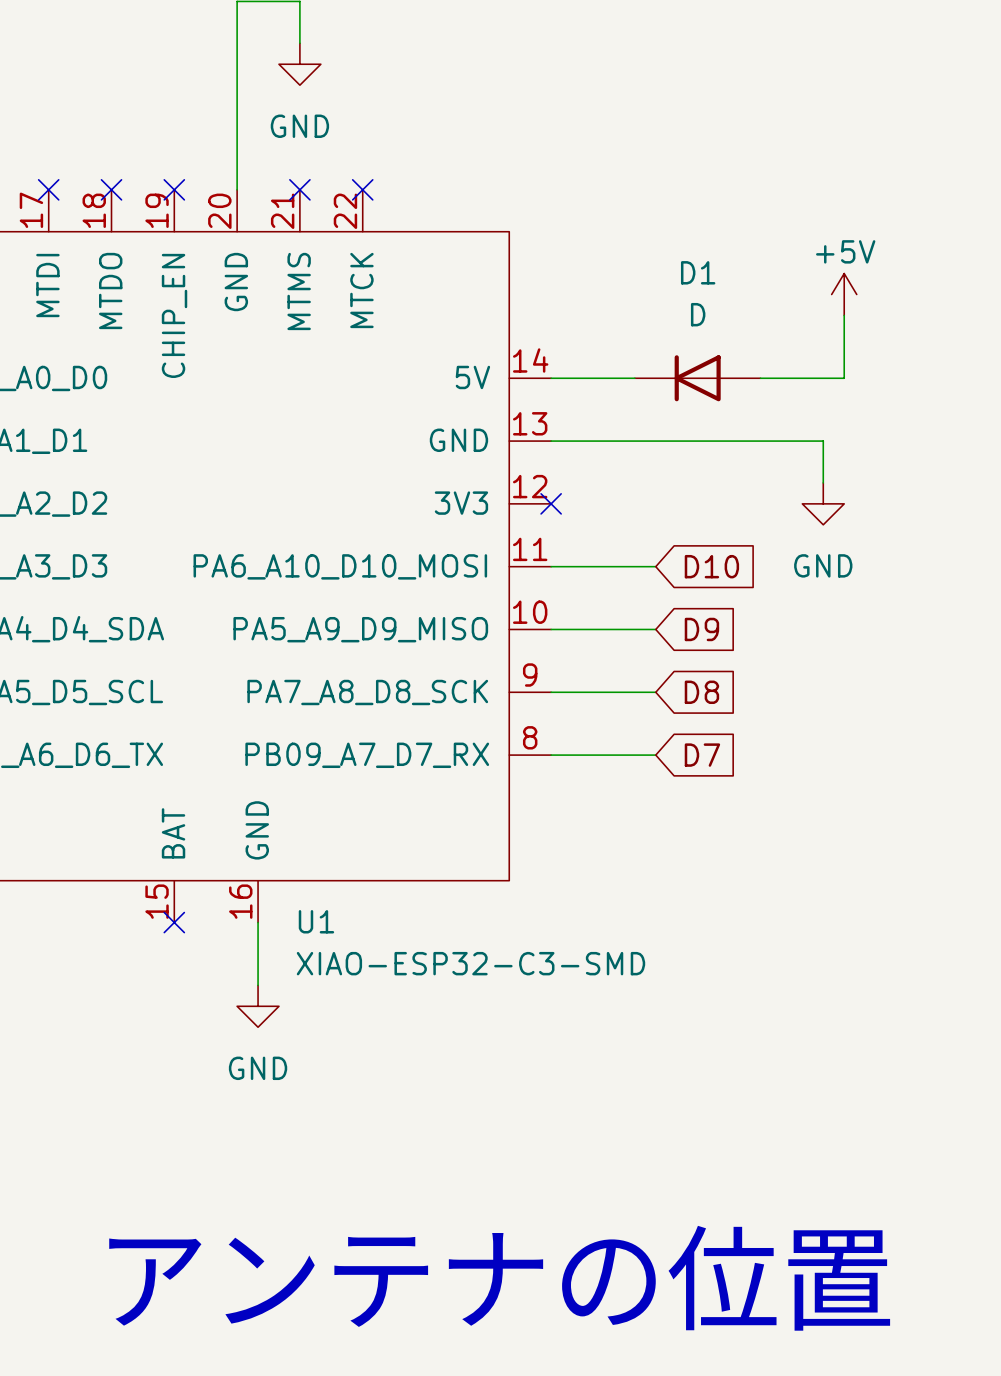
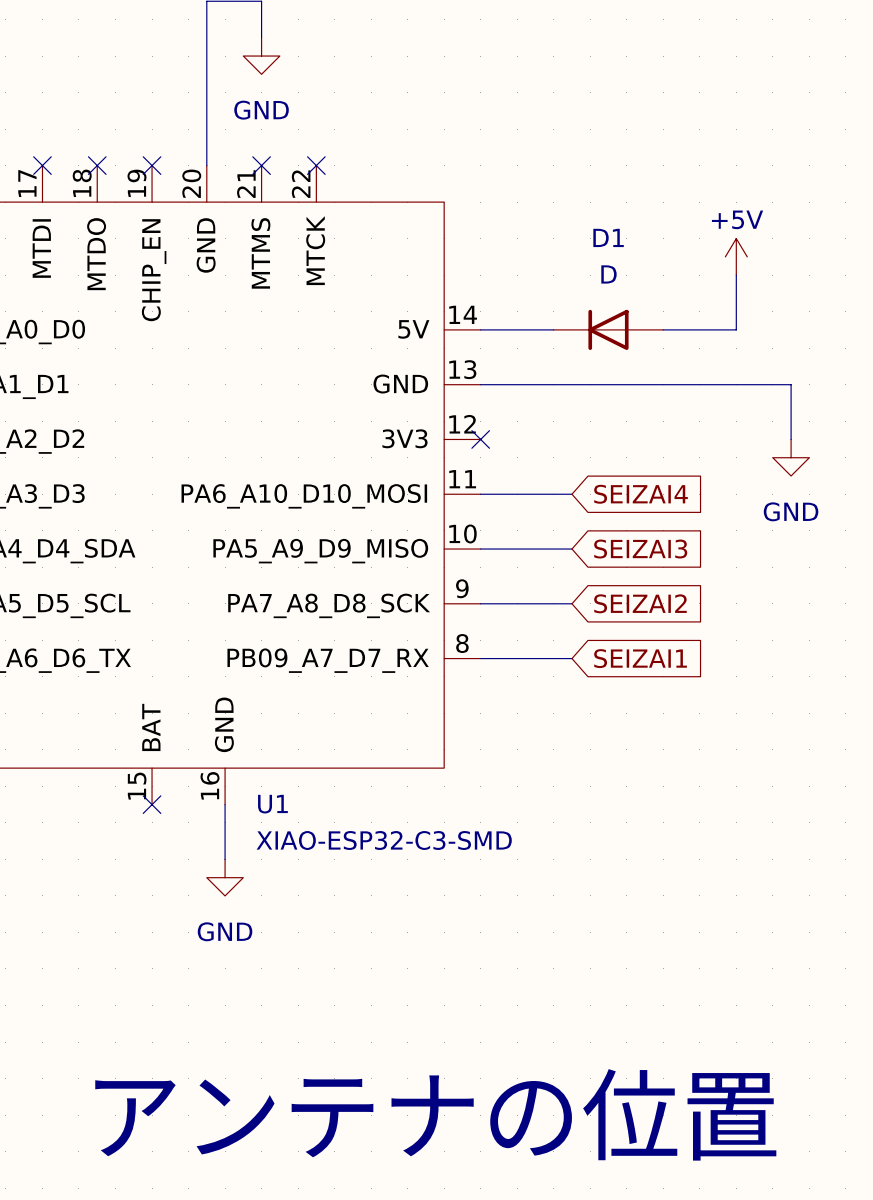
wire: (823, 441) (823, 482) -> (718, 384) (791, 384) (791, 439)
power symbol position: GND (823, 503) -> GND (791, 457)
global label: D10 (711, 566) -> SEIZAI4 (641, 494)
global label: D9 (701, 629) -> SEIZAI3 (640, 549)
global label: D8 (701, 692) -> SEIZAI2 (640, 603)
global label: D7 (702, 755) -> SEIZAI1 (640, 658)

